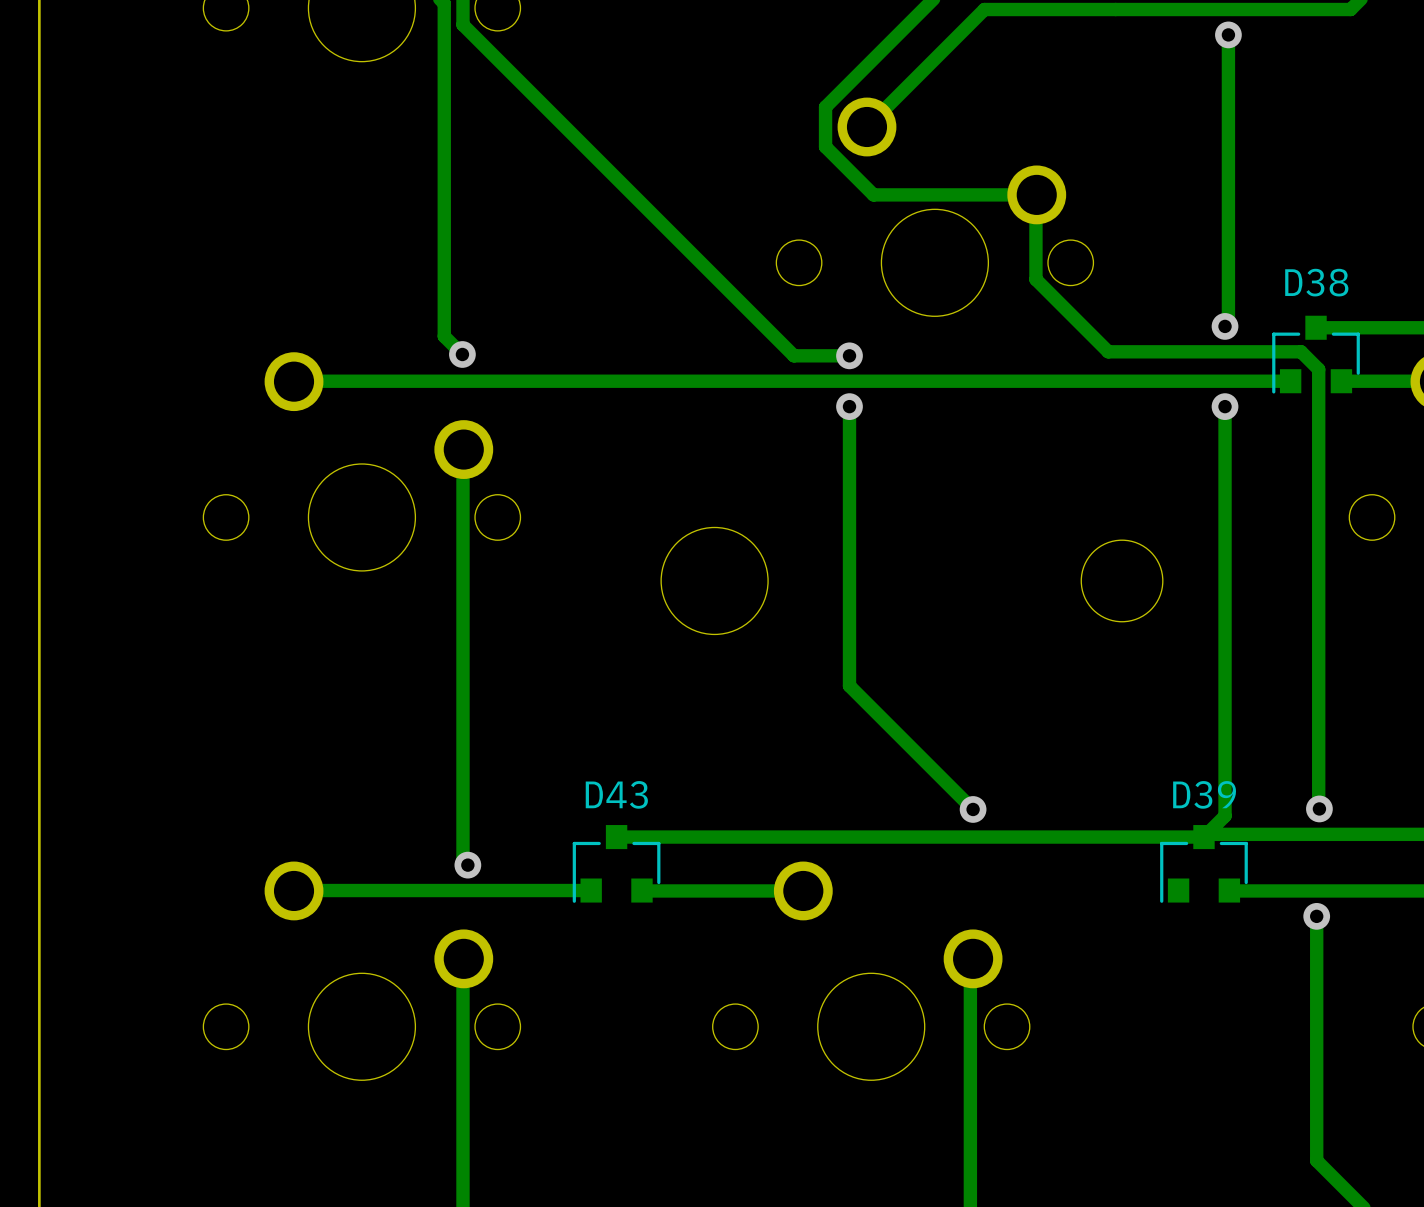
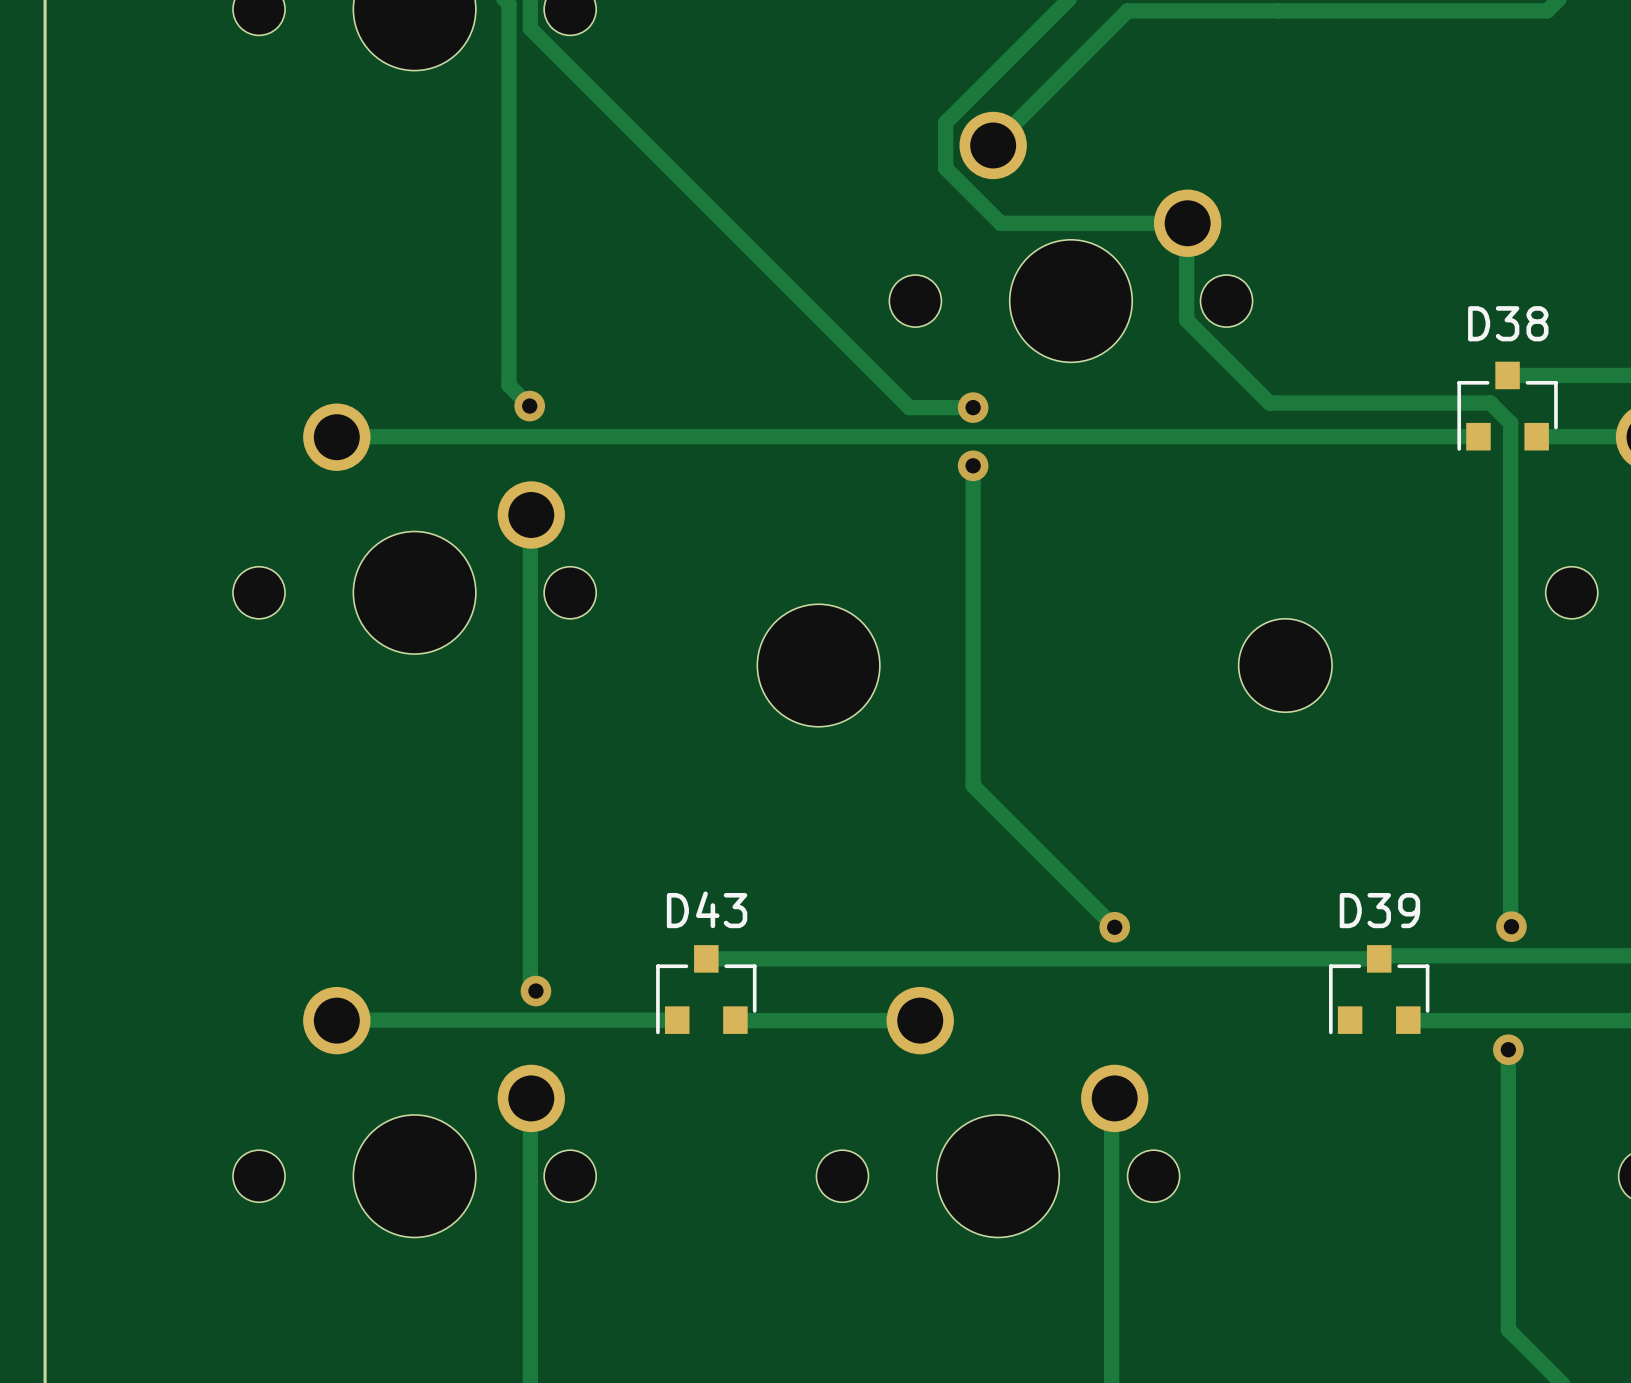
track: (1228, 34) (1228, 323) (1225, 326) -> none
via: (1228, 34) -> none
via: (1225, 326) -> none
track: (1225, 406) (1225, 816) (1206, 834) -> none
via: (1225, 406) -> none

